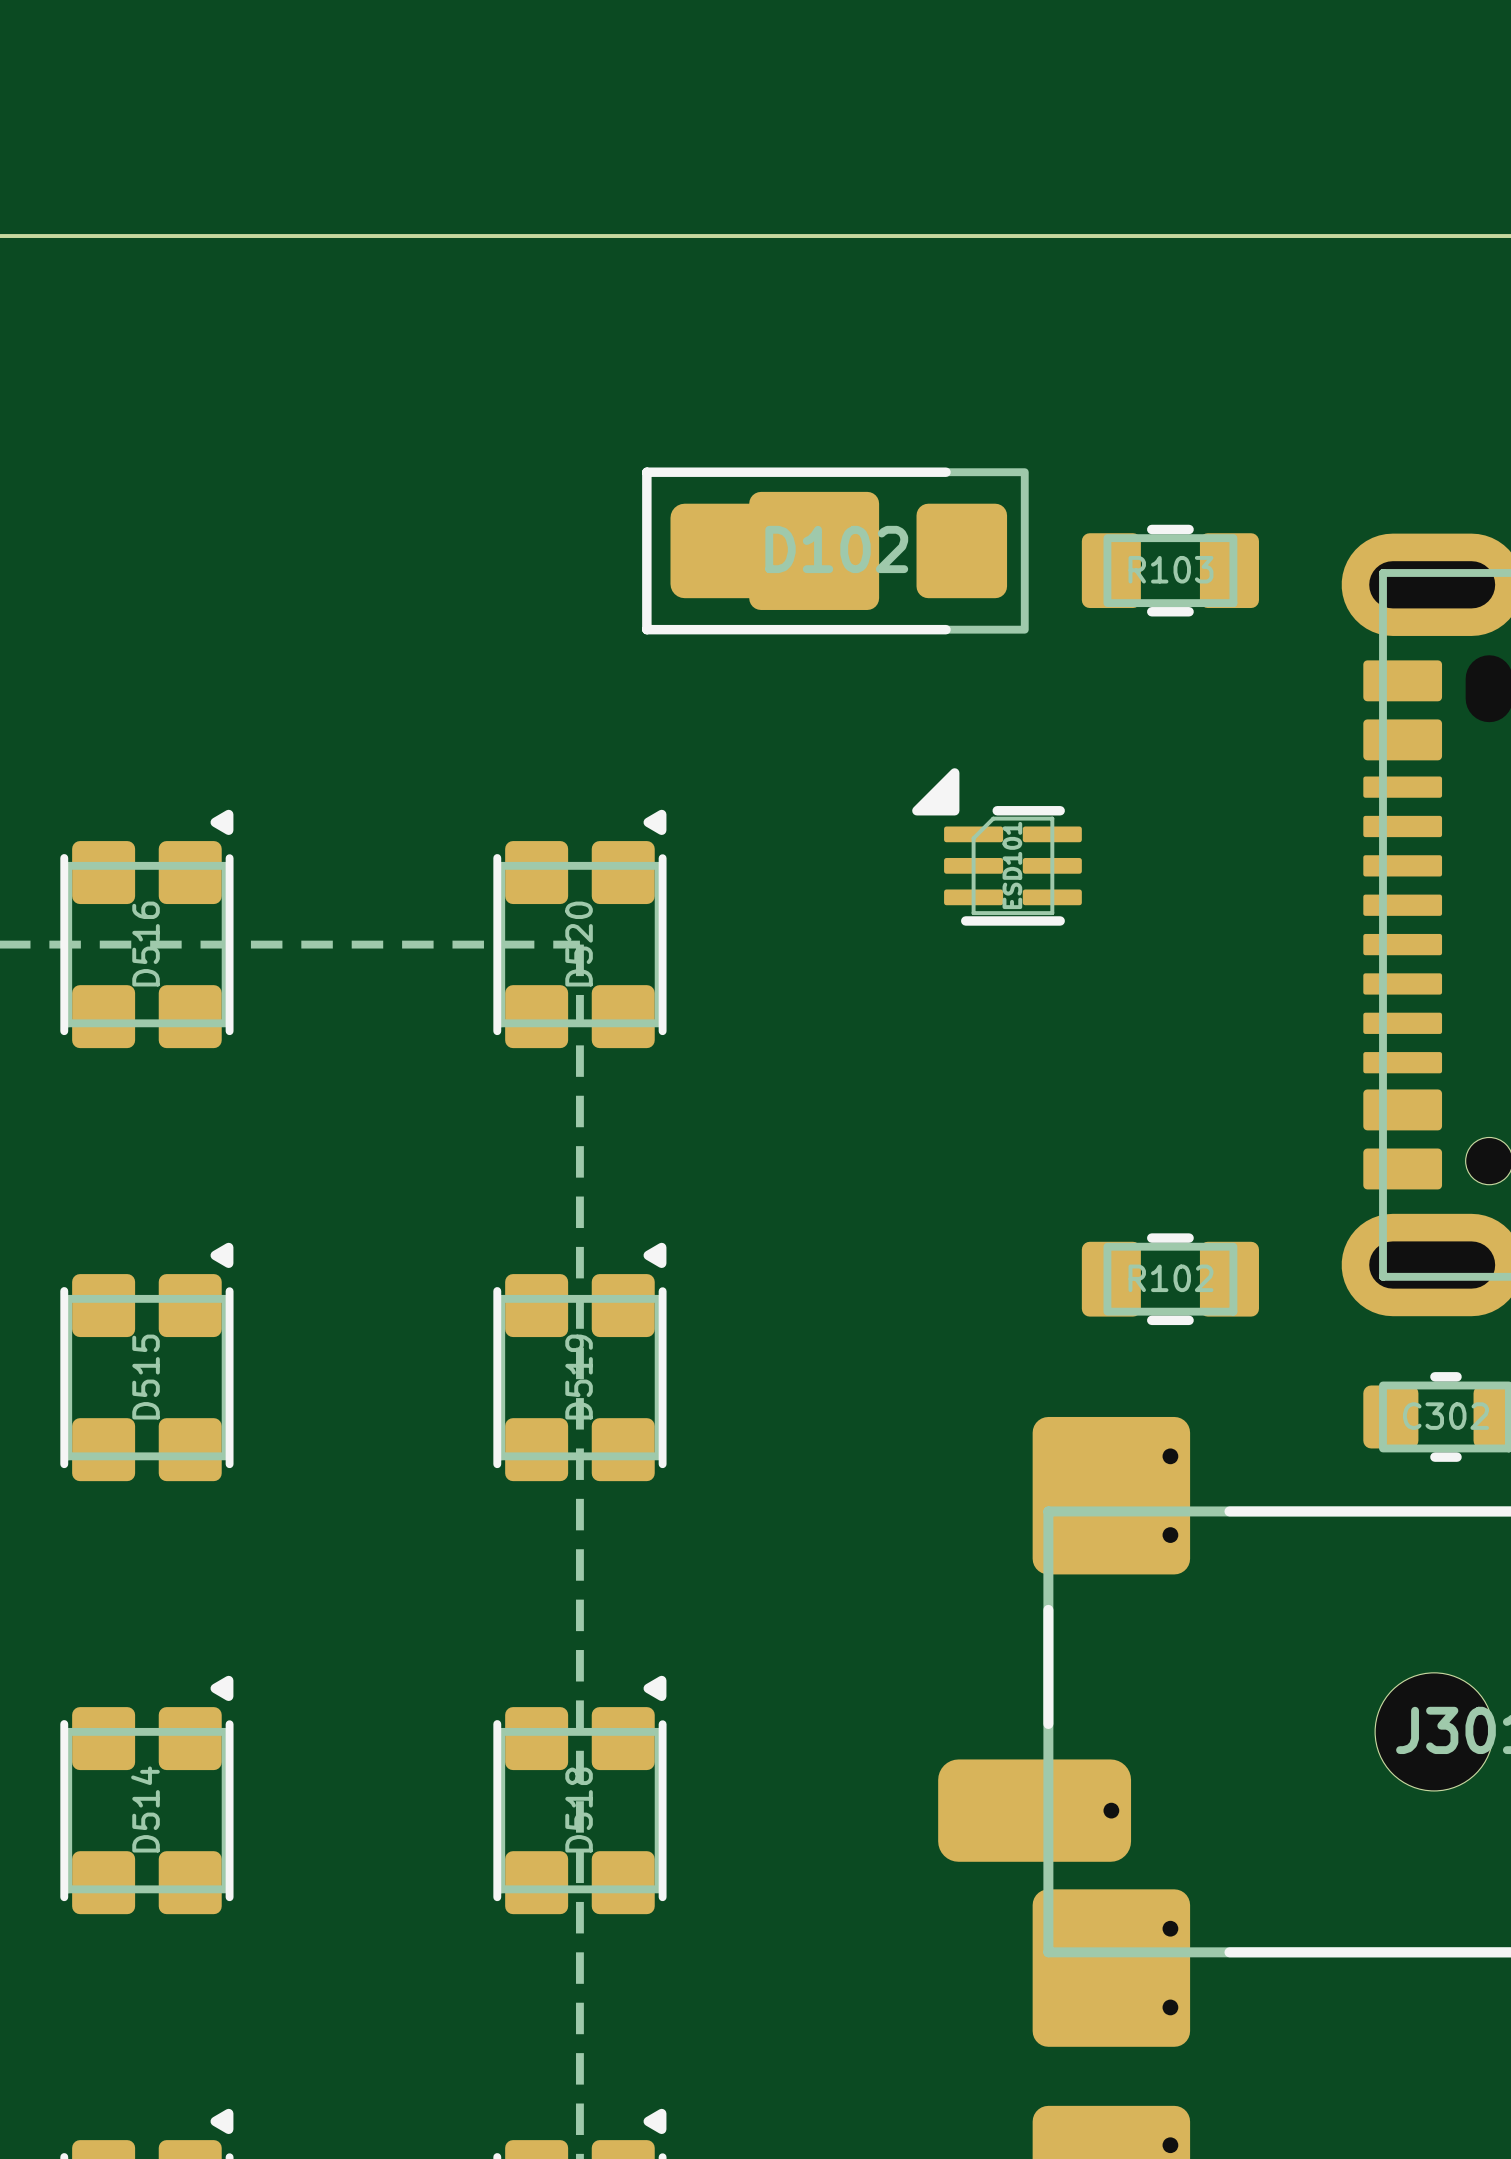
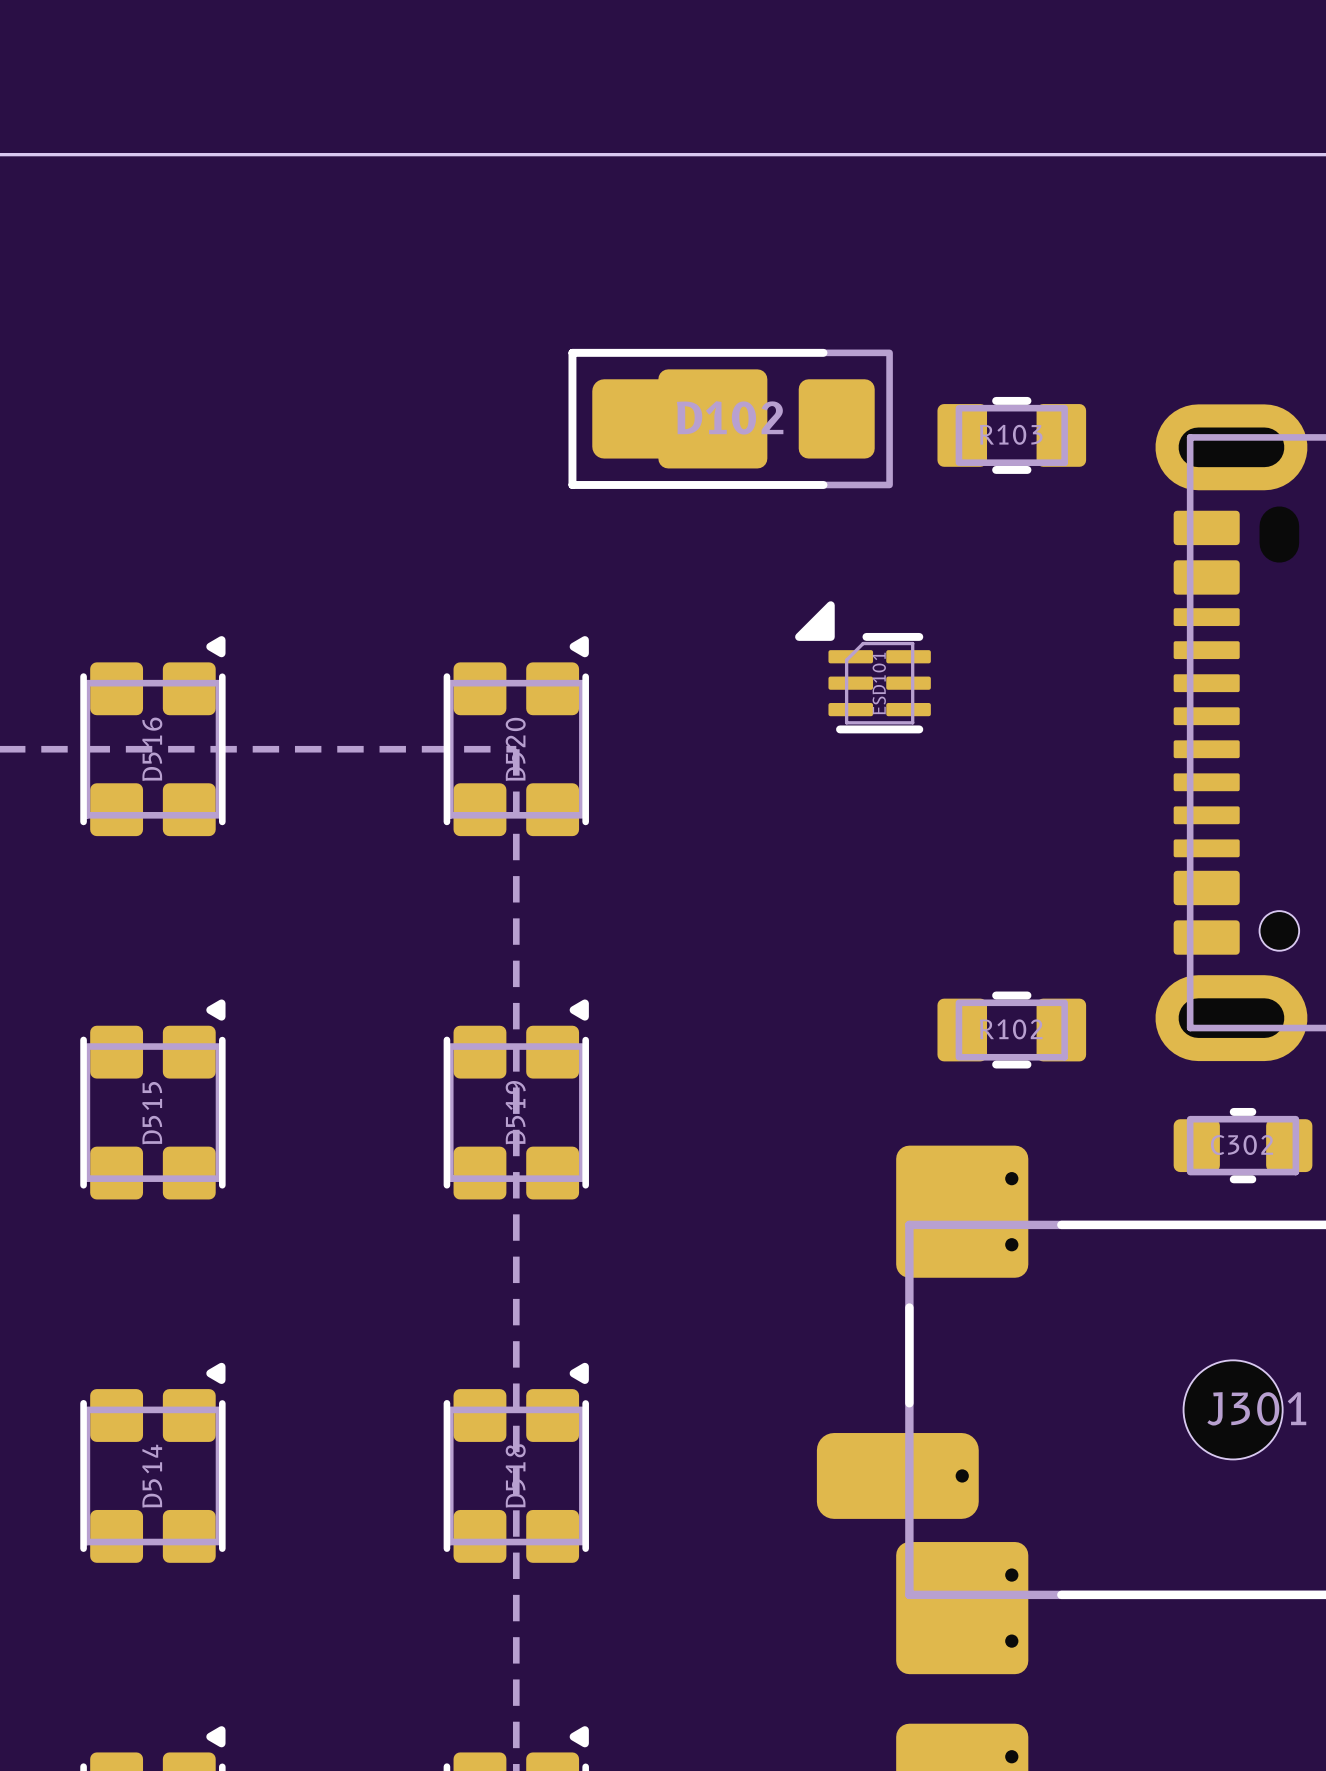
ESD101 footprint: [912, 768, 1082, 926] -> [795, 601, 931, 734]

